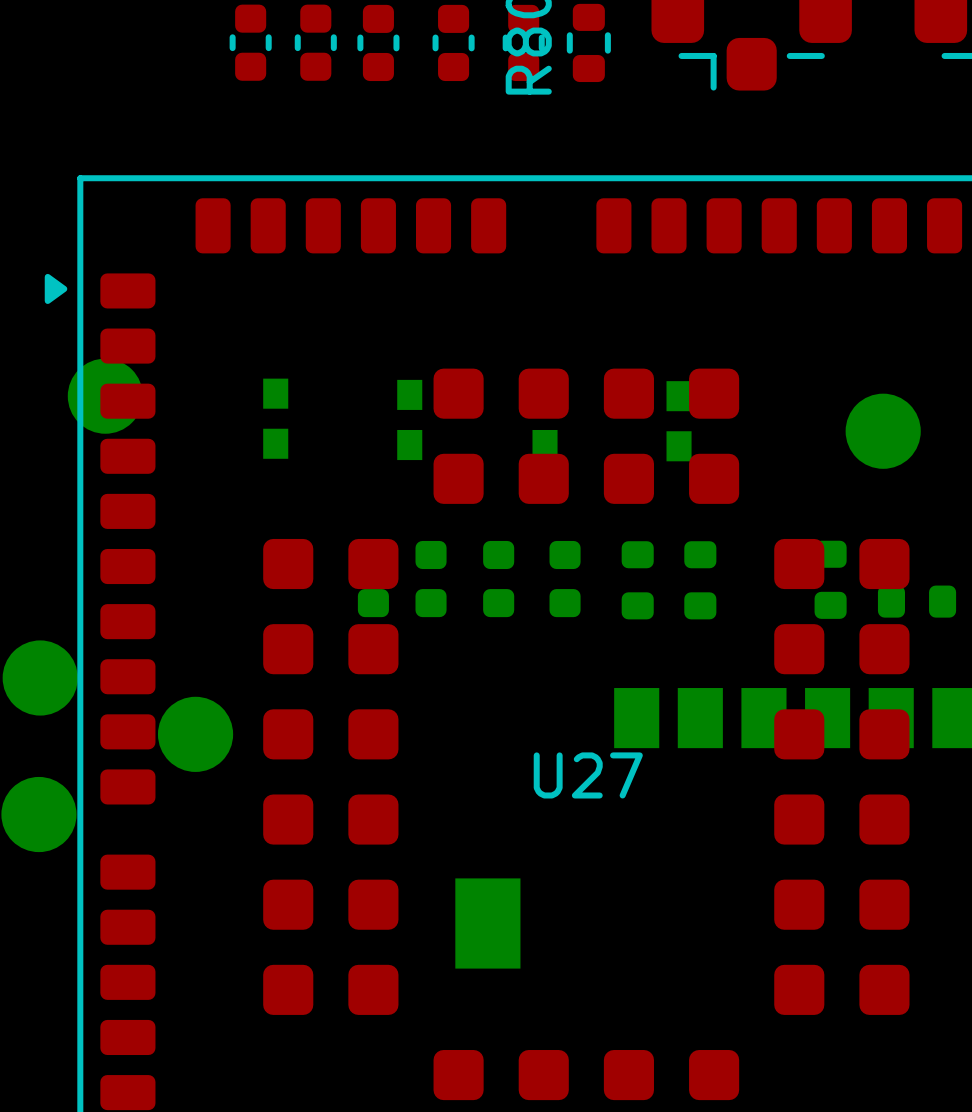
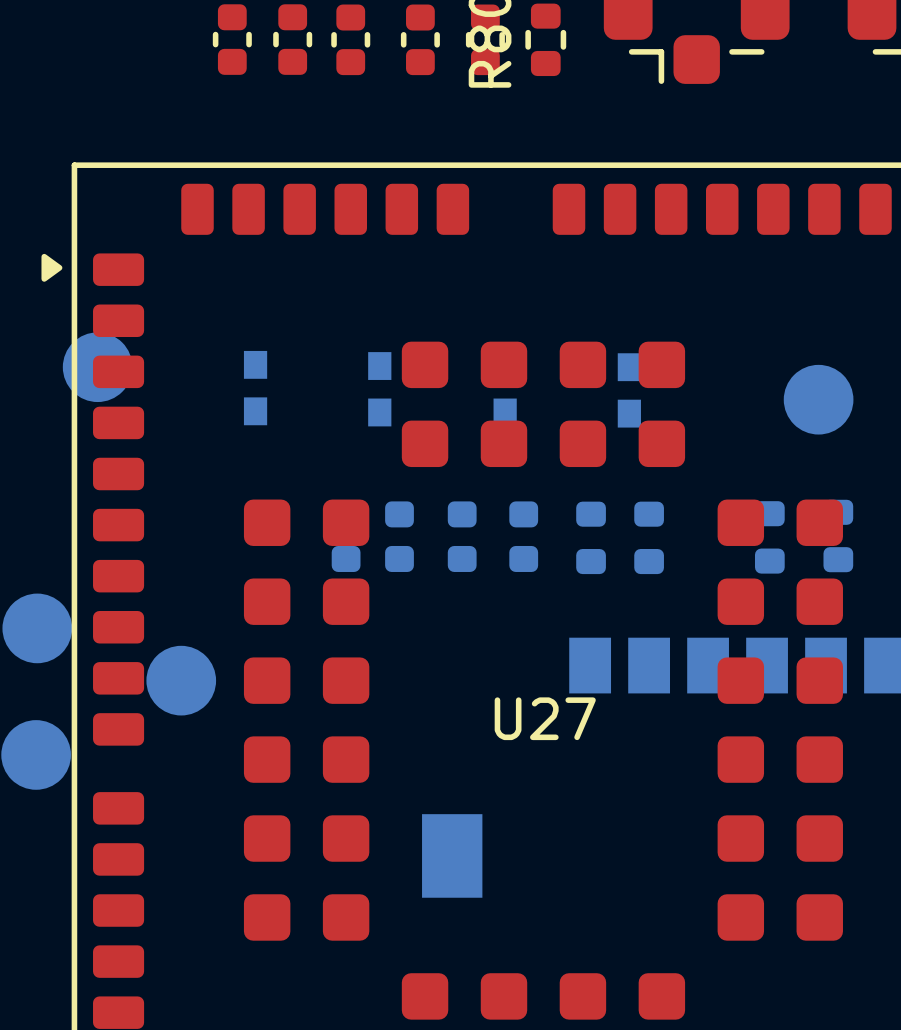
part rotation: 0° (917, 601) -> 90° clockwise (838, 535)

